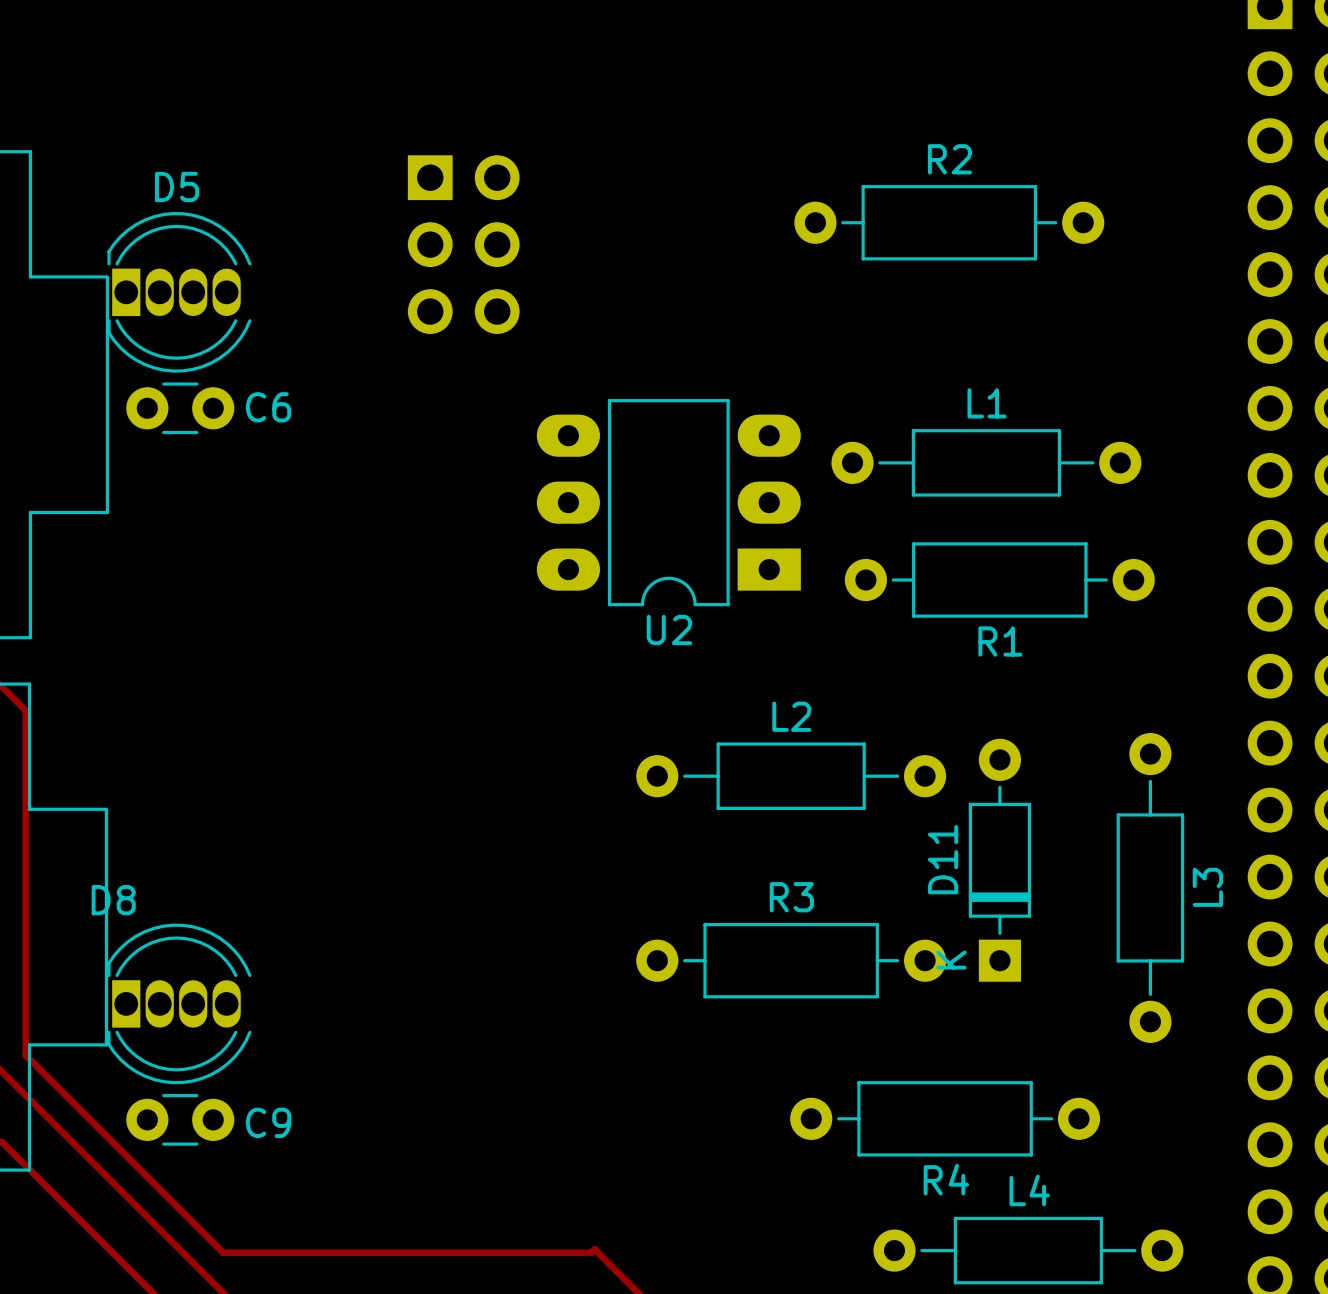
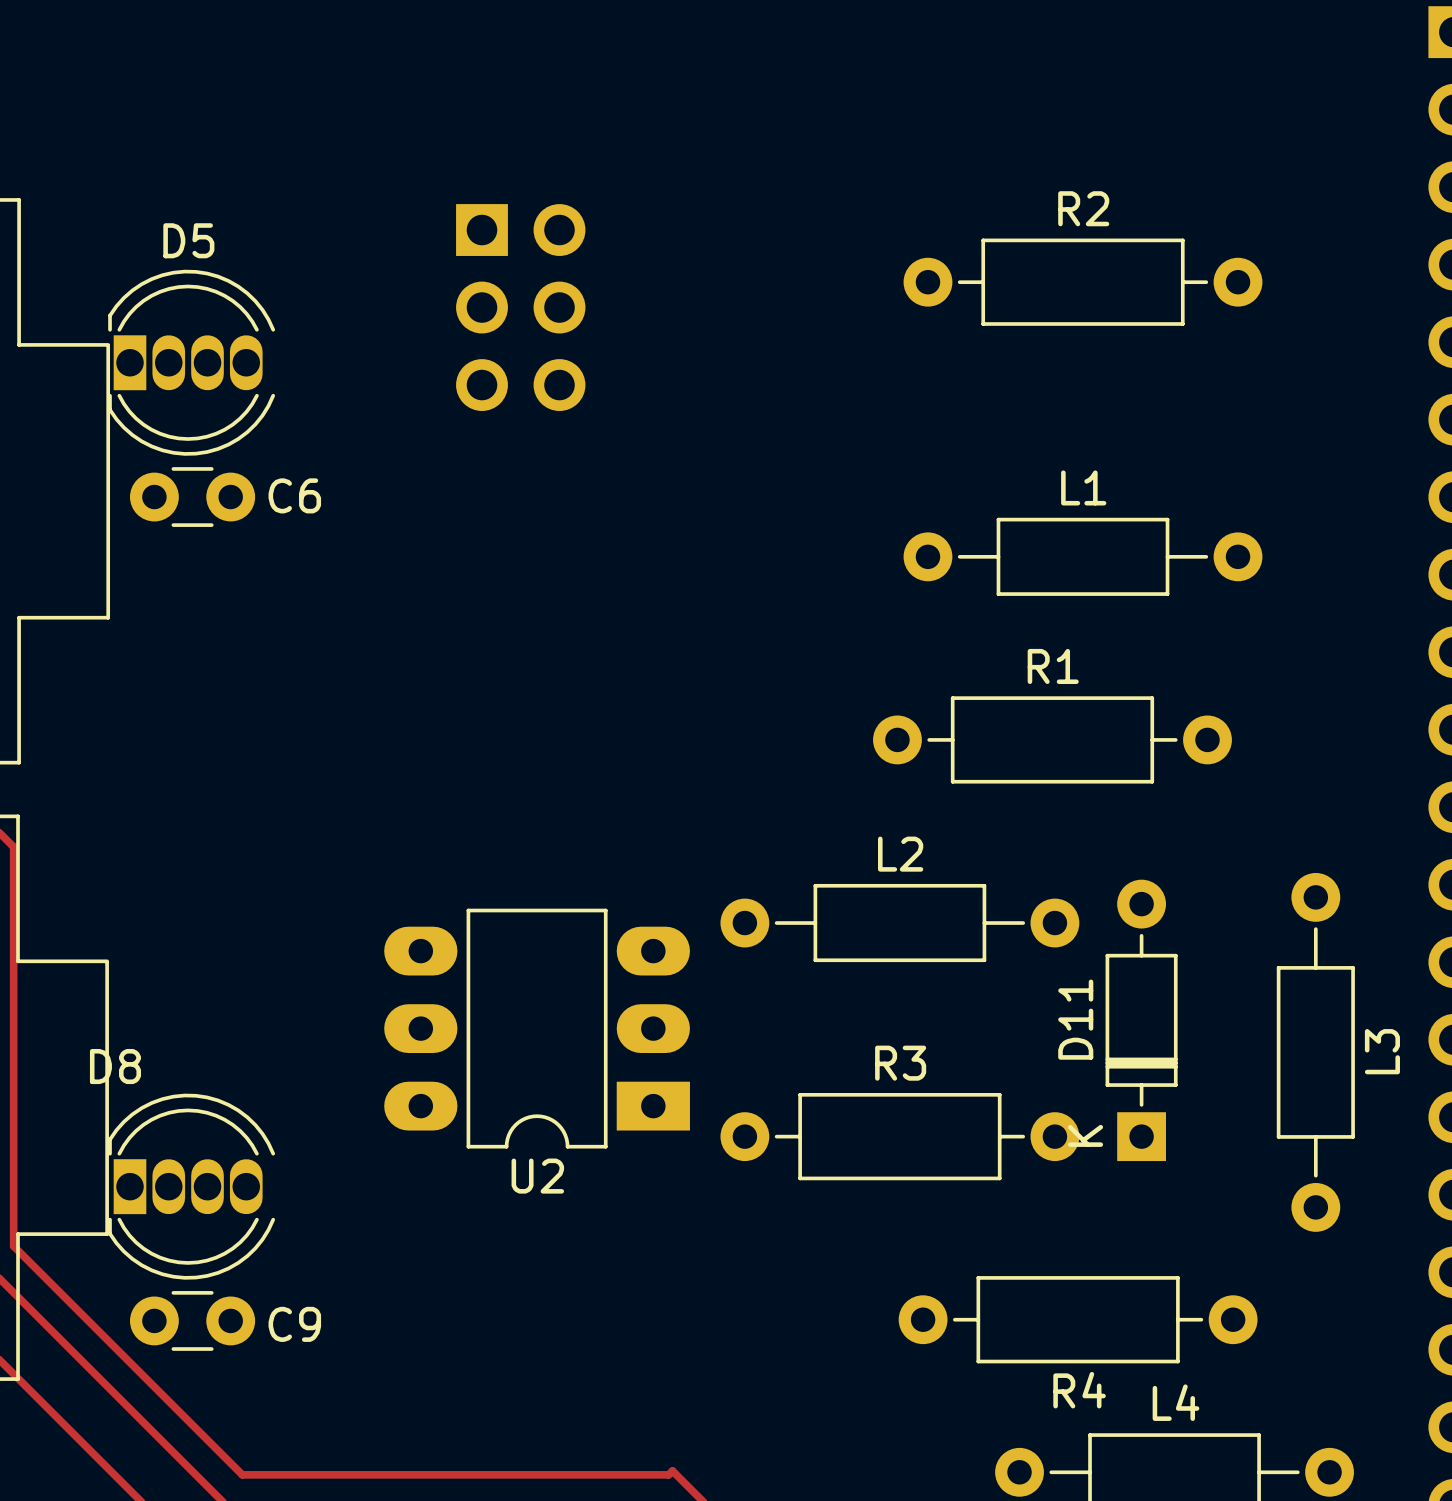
L1 position: (986, 462) -> (1083, 556)
U2 position: (668, 502) -> (537, 1028)
R1 position: (999, 580) -> (1052, 739)
R1 name position: R1 (1000, 641) -> R1 (1053, 666)

